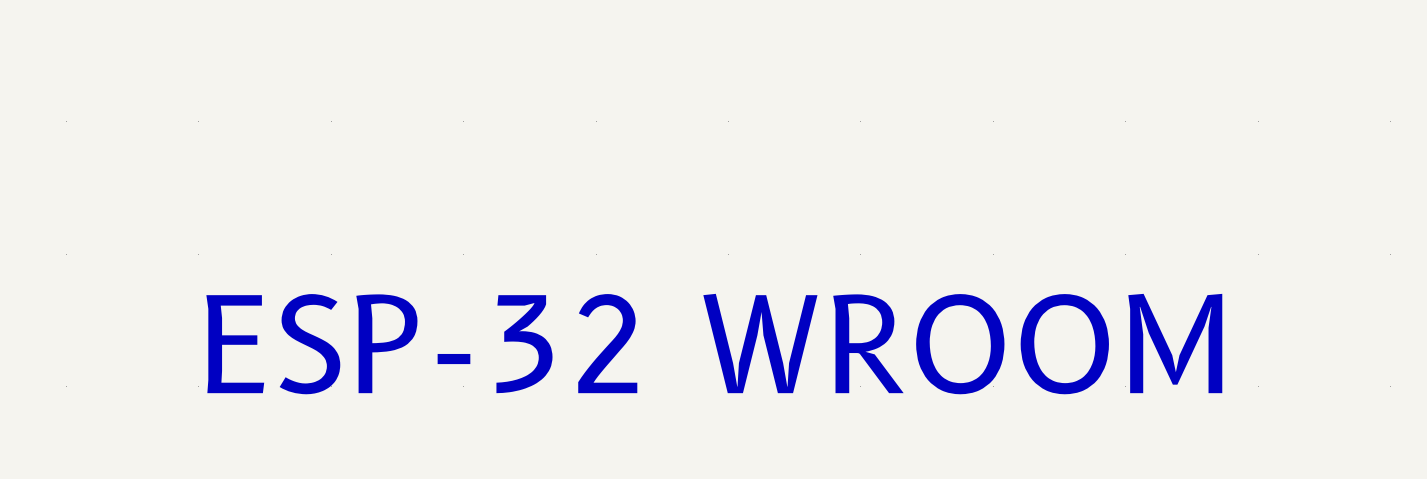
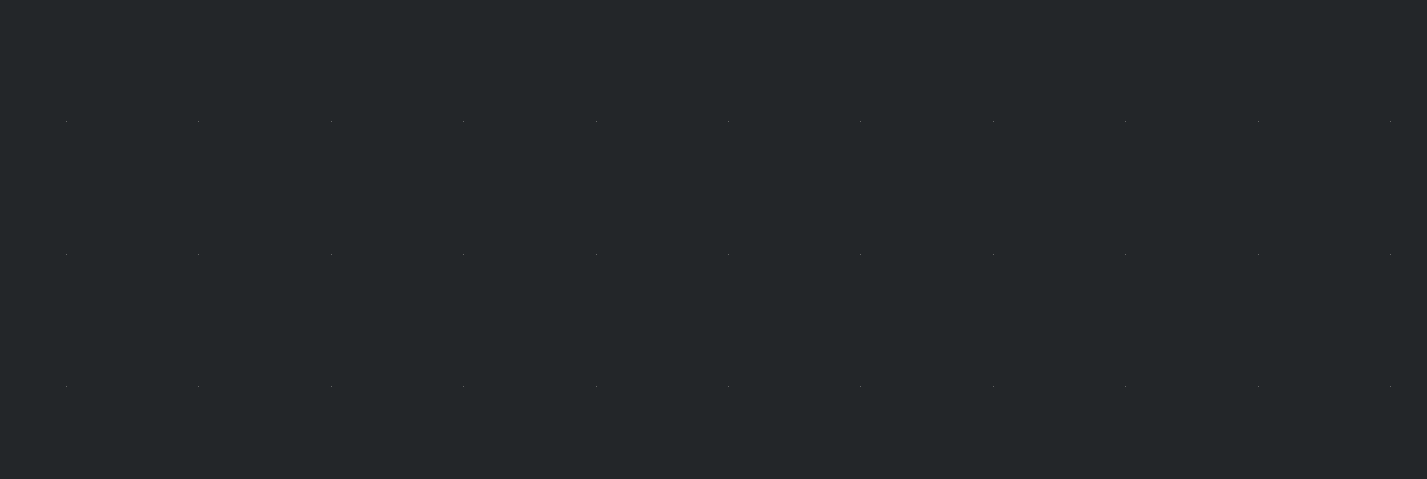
text: ESP-32 WROOM (714, 344) -> none

